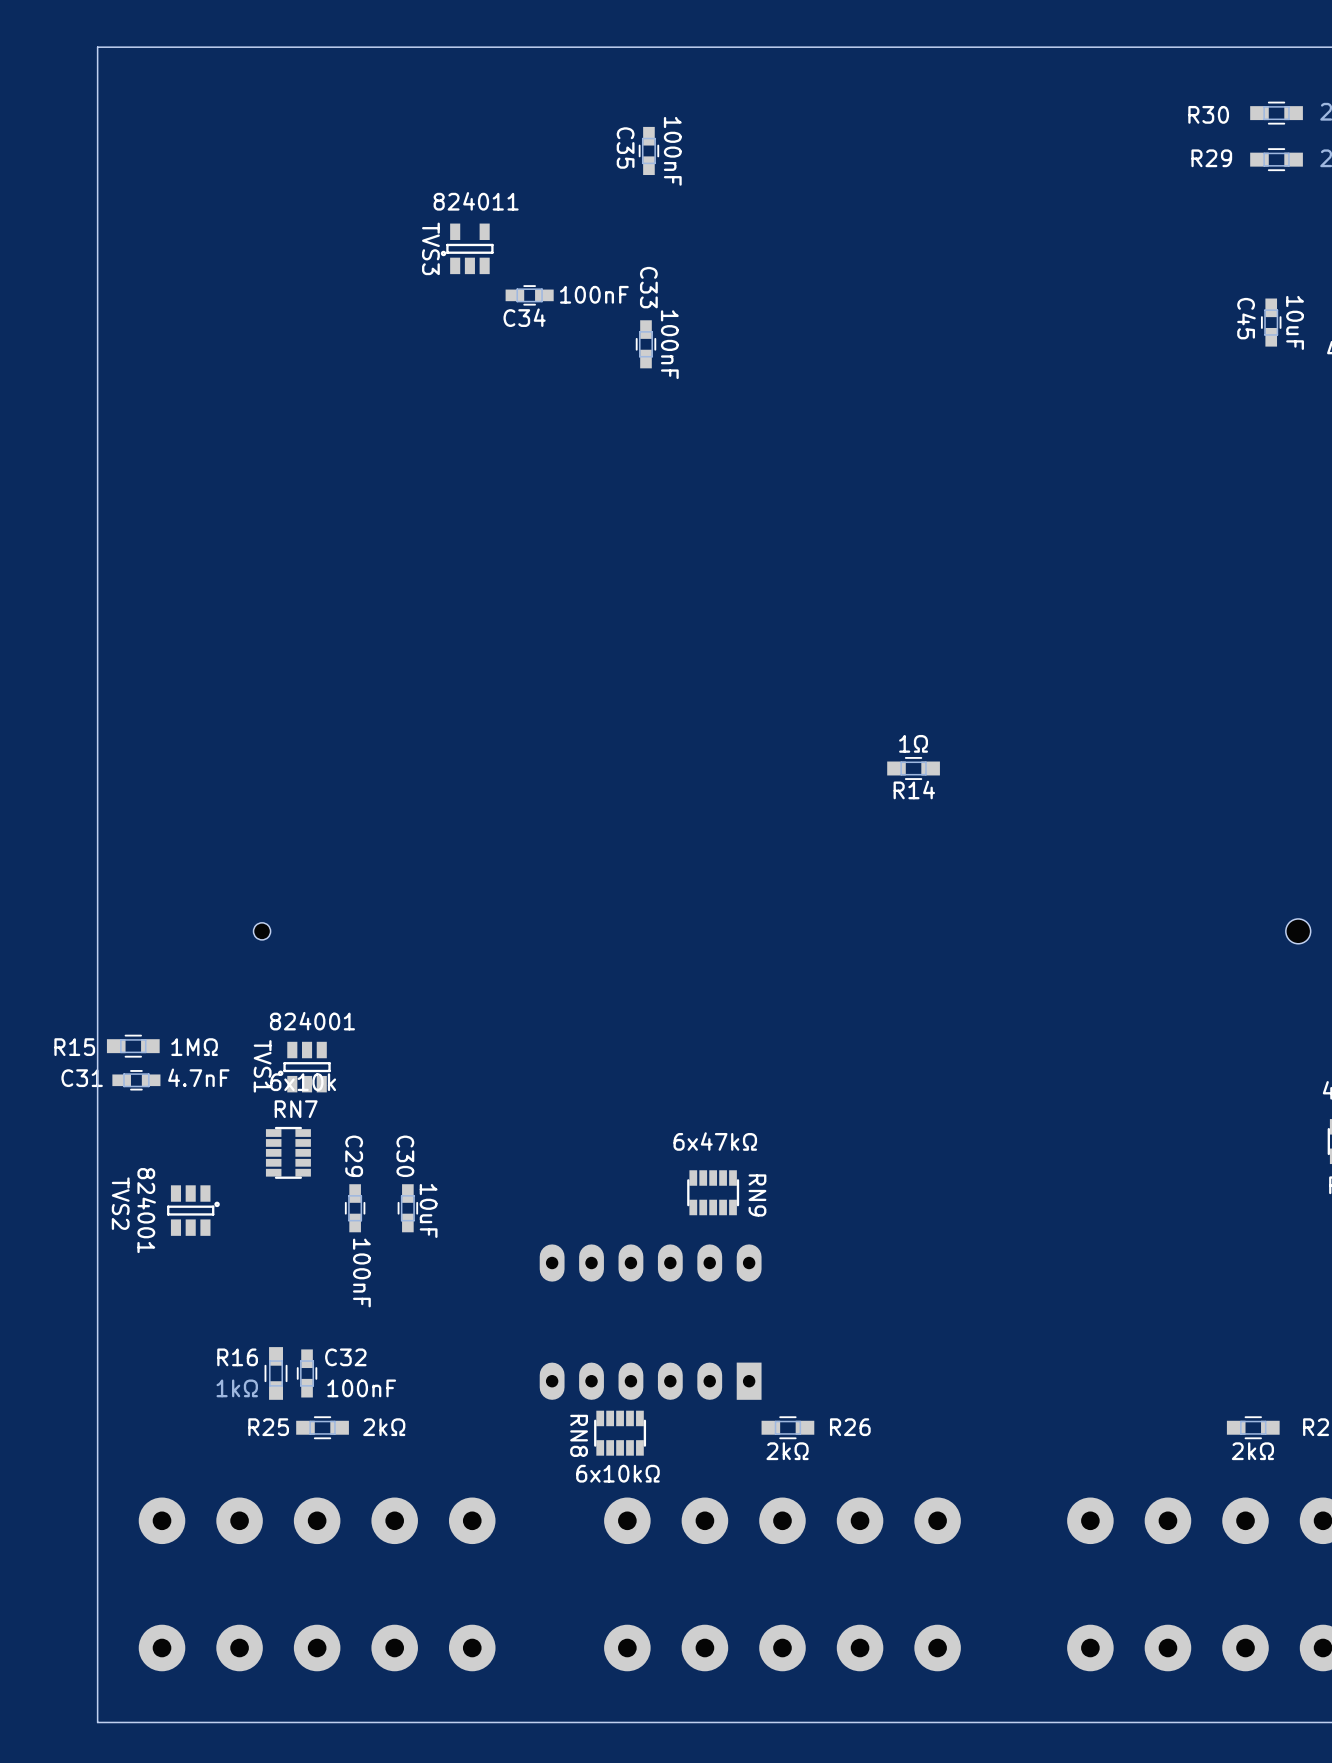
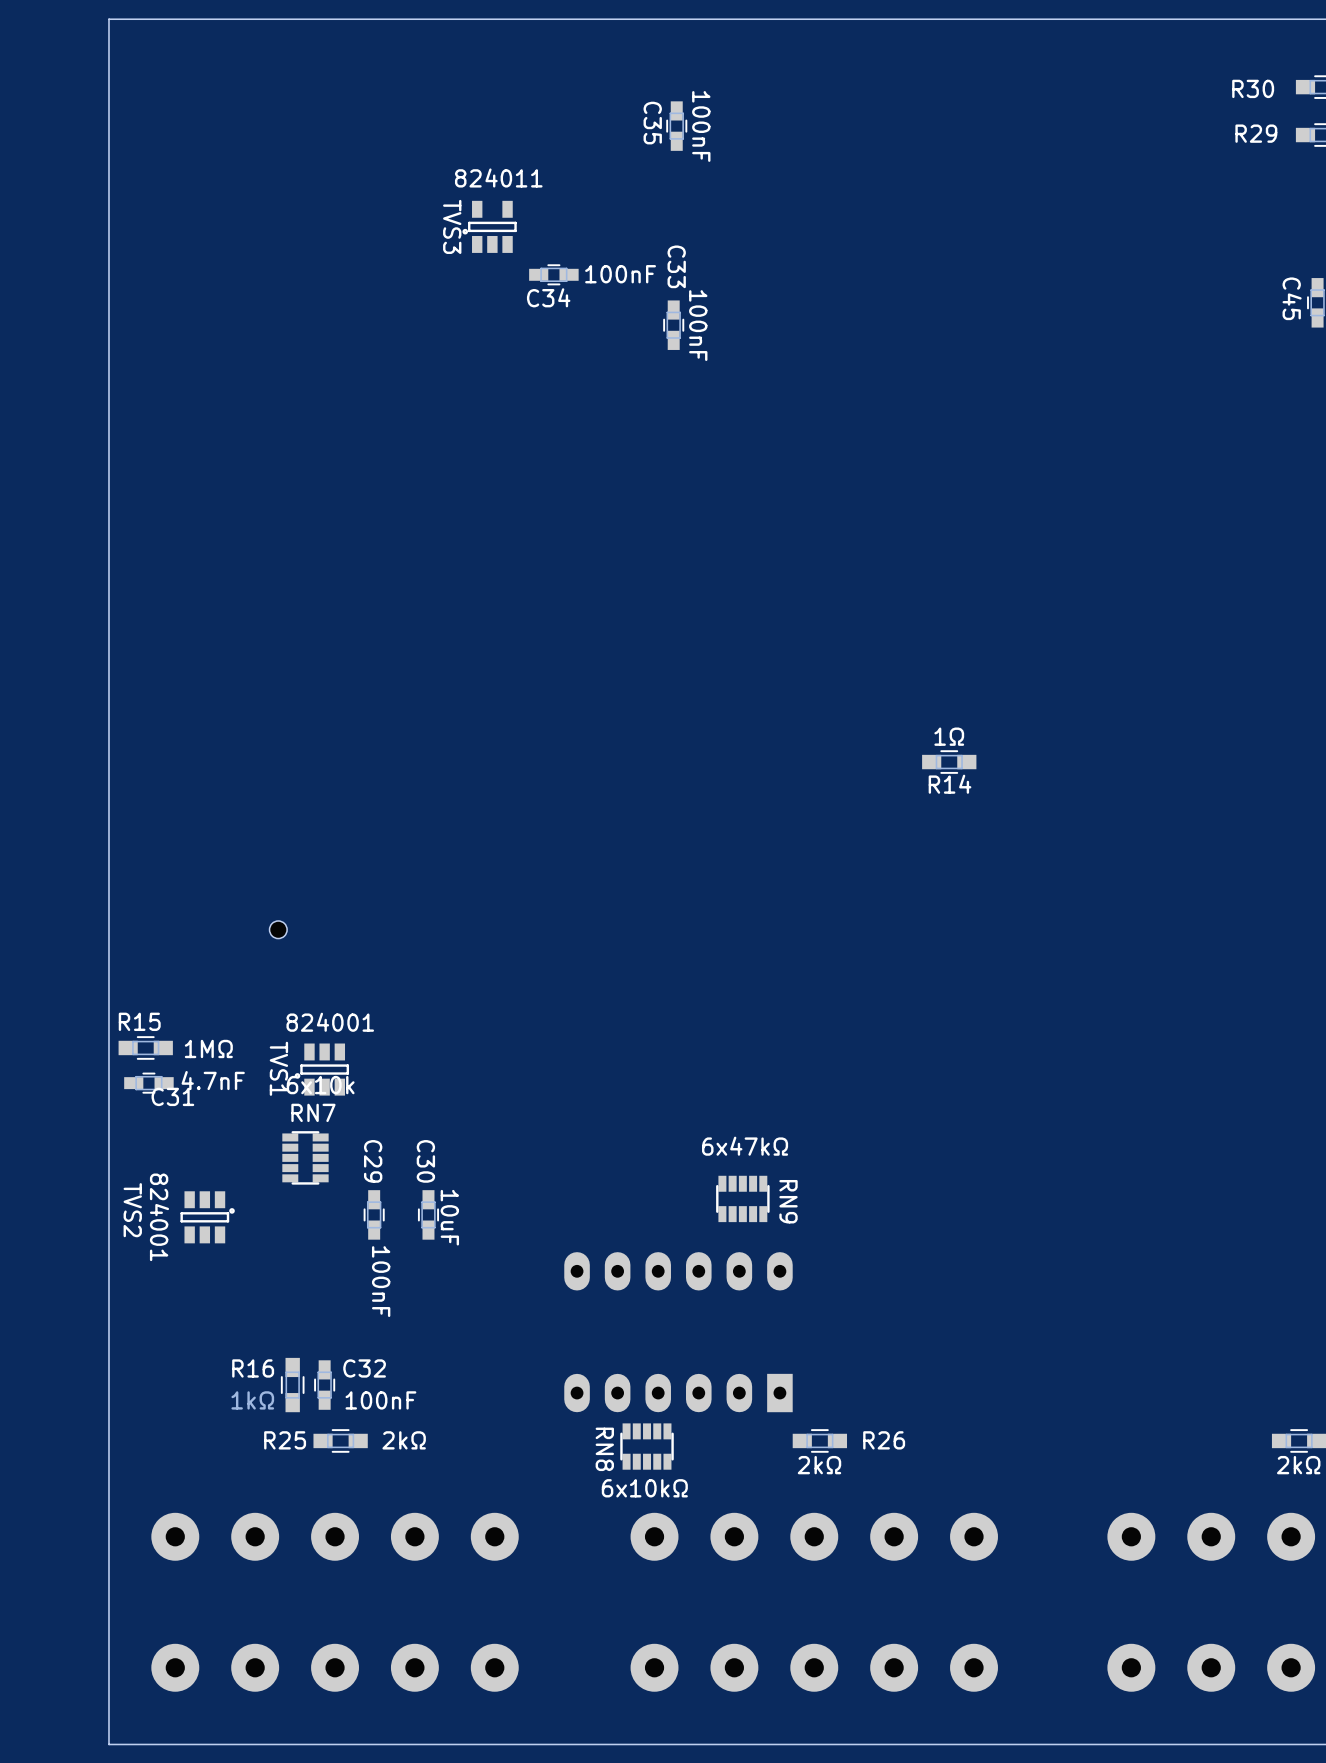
R15 name position: R15 (74, 1047) -> R15 (139, 1021)
C31 name position: C31 (82, 1078) -> C31 (172, 1096)

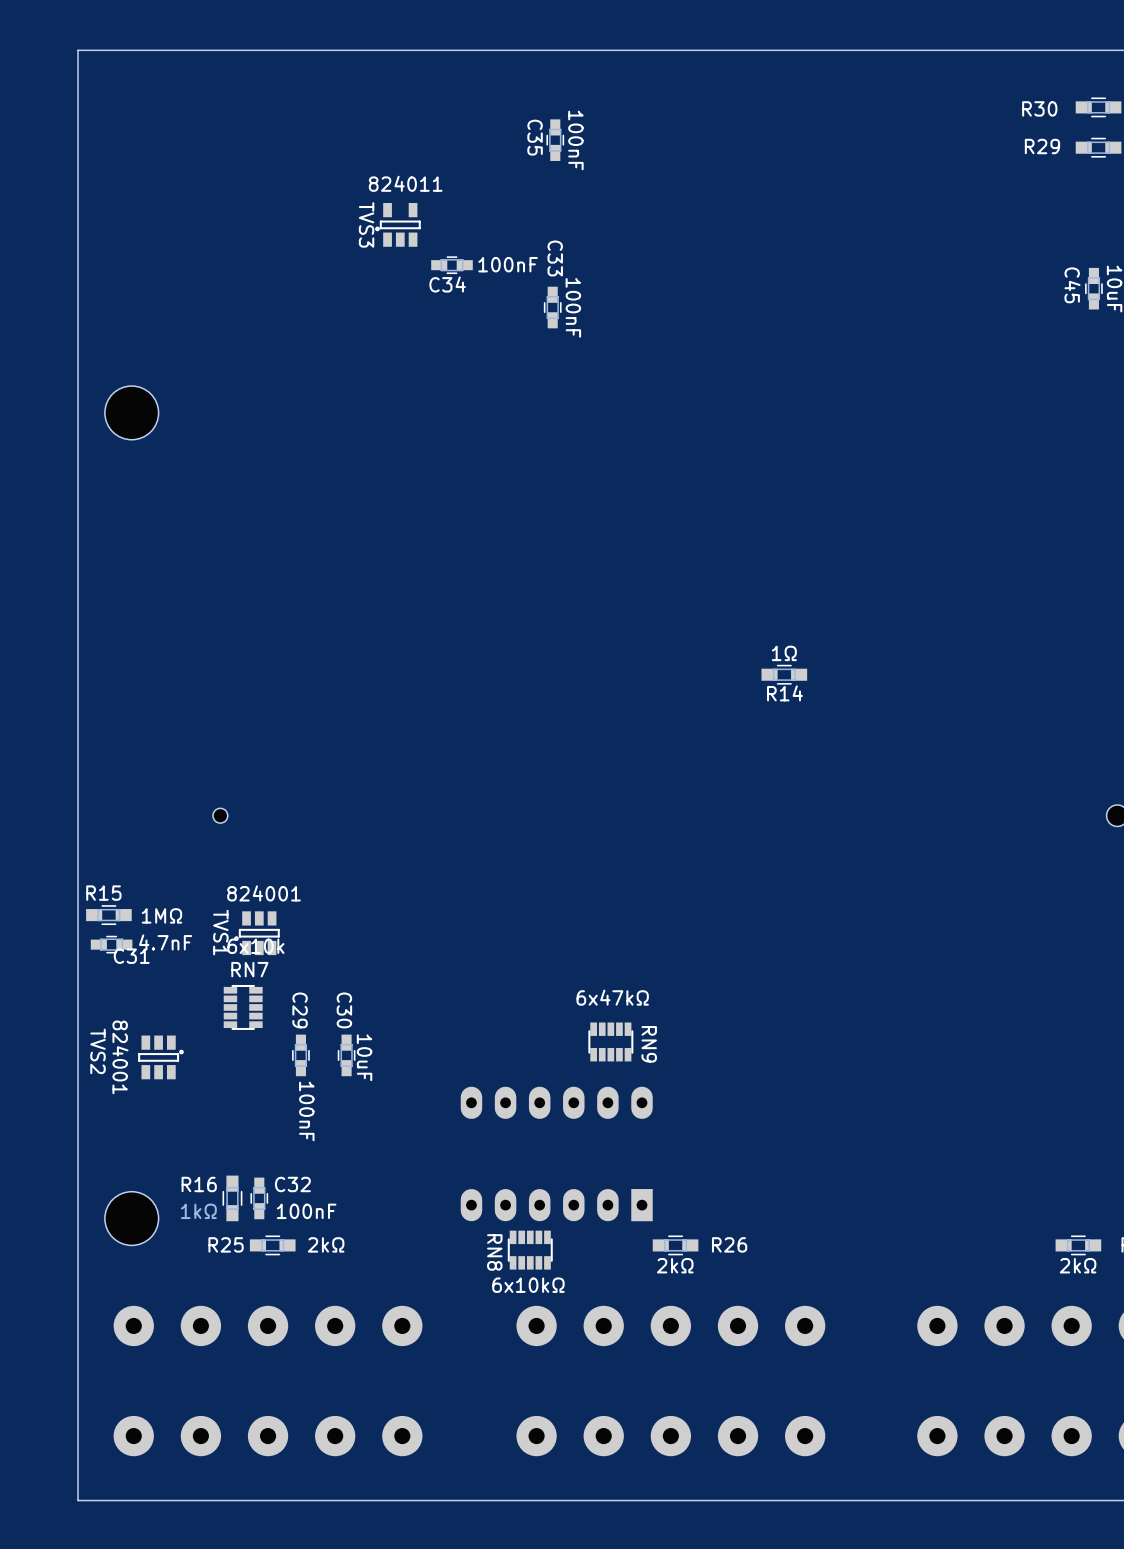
part: none -> (131, 412)
part: none -> (131, 1218)

